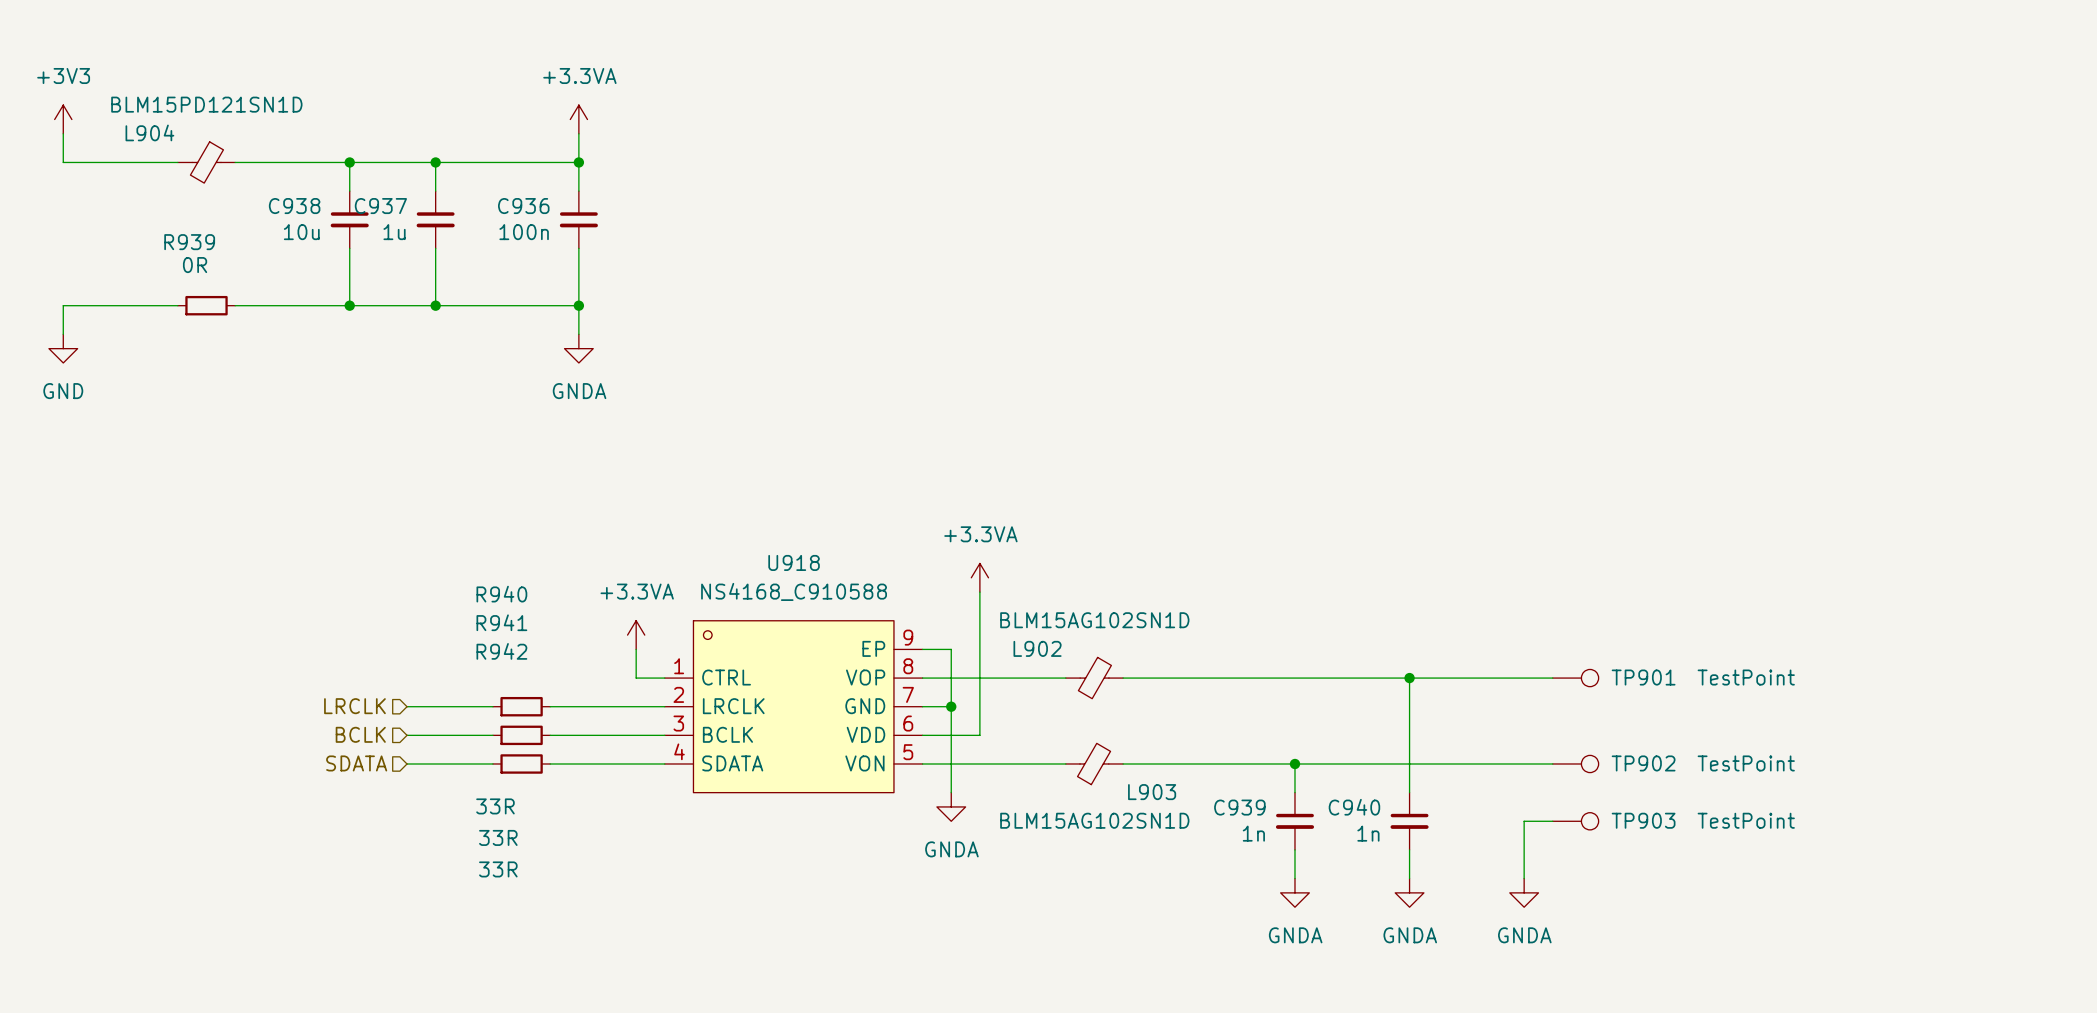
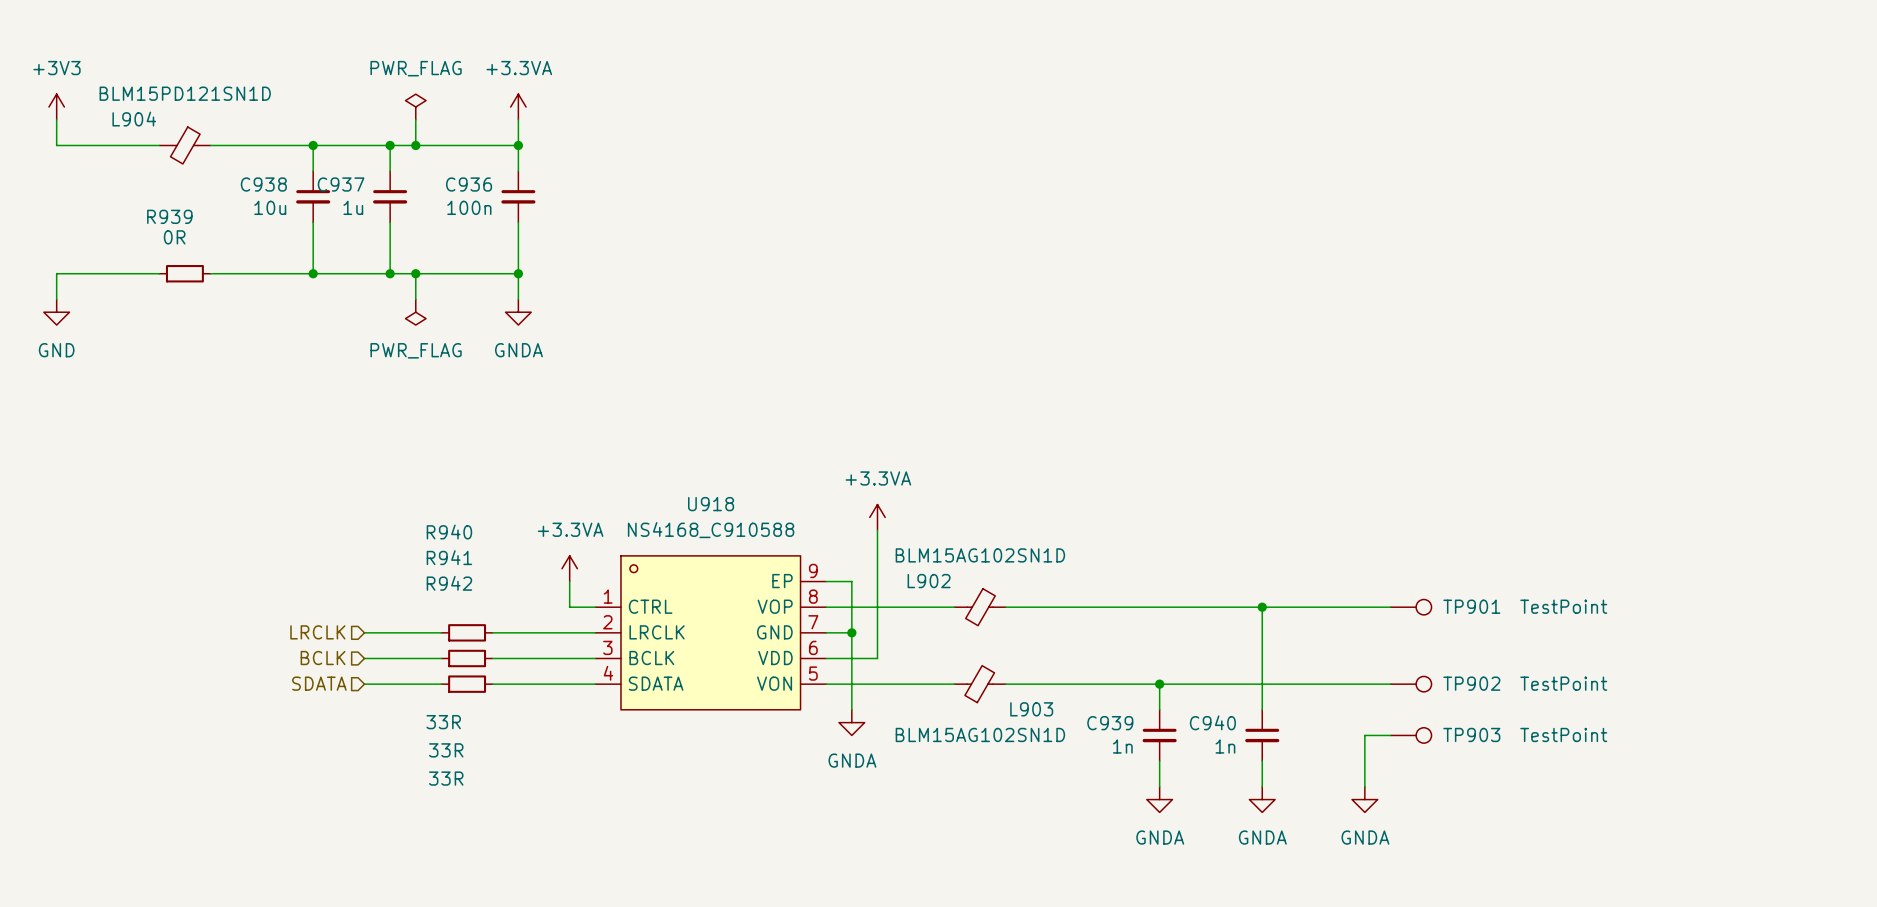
power symbol: none -> PWR_FLAG (415, 107)
wire: none -> (415, 119) (415, 145)
junction: none -> (415, 145)
wire: none -> (415, 273) (415, 299)
junction: none -> (415, 273)
power symbol: none -> PWR_FLAG (415, 312)

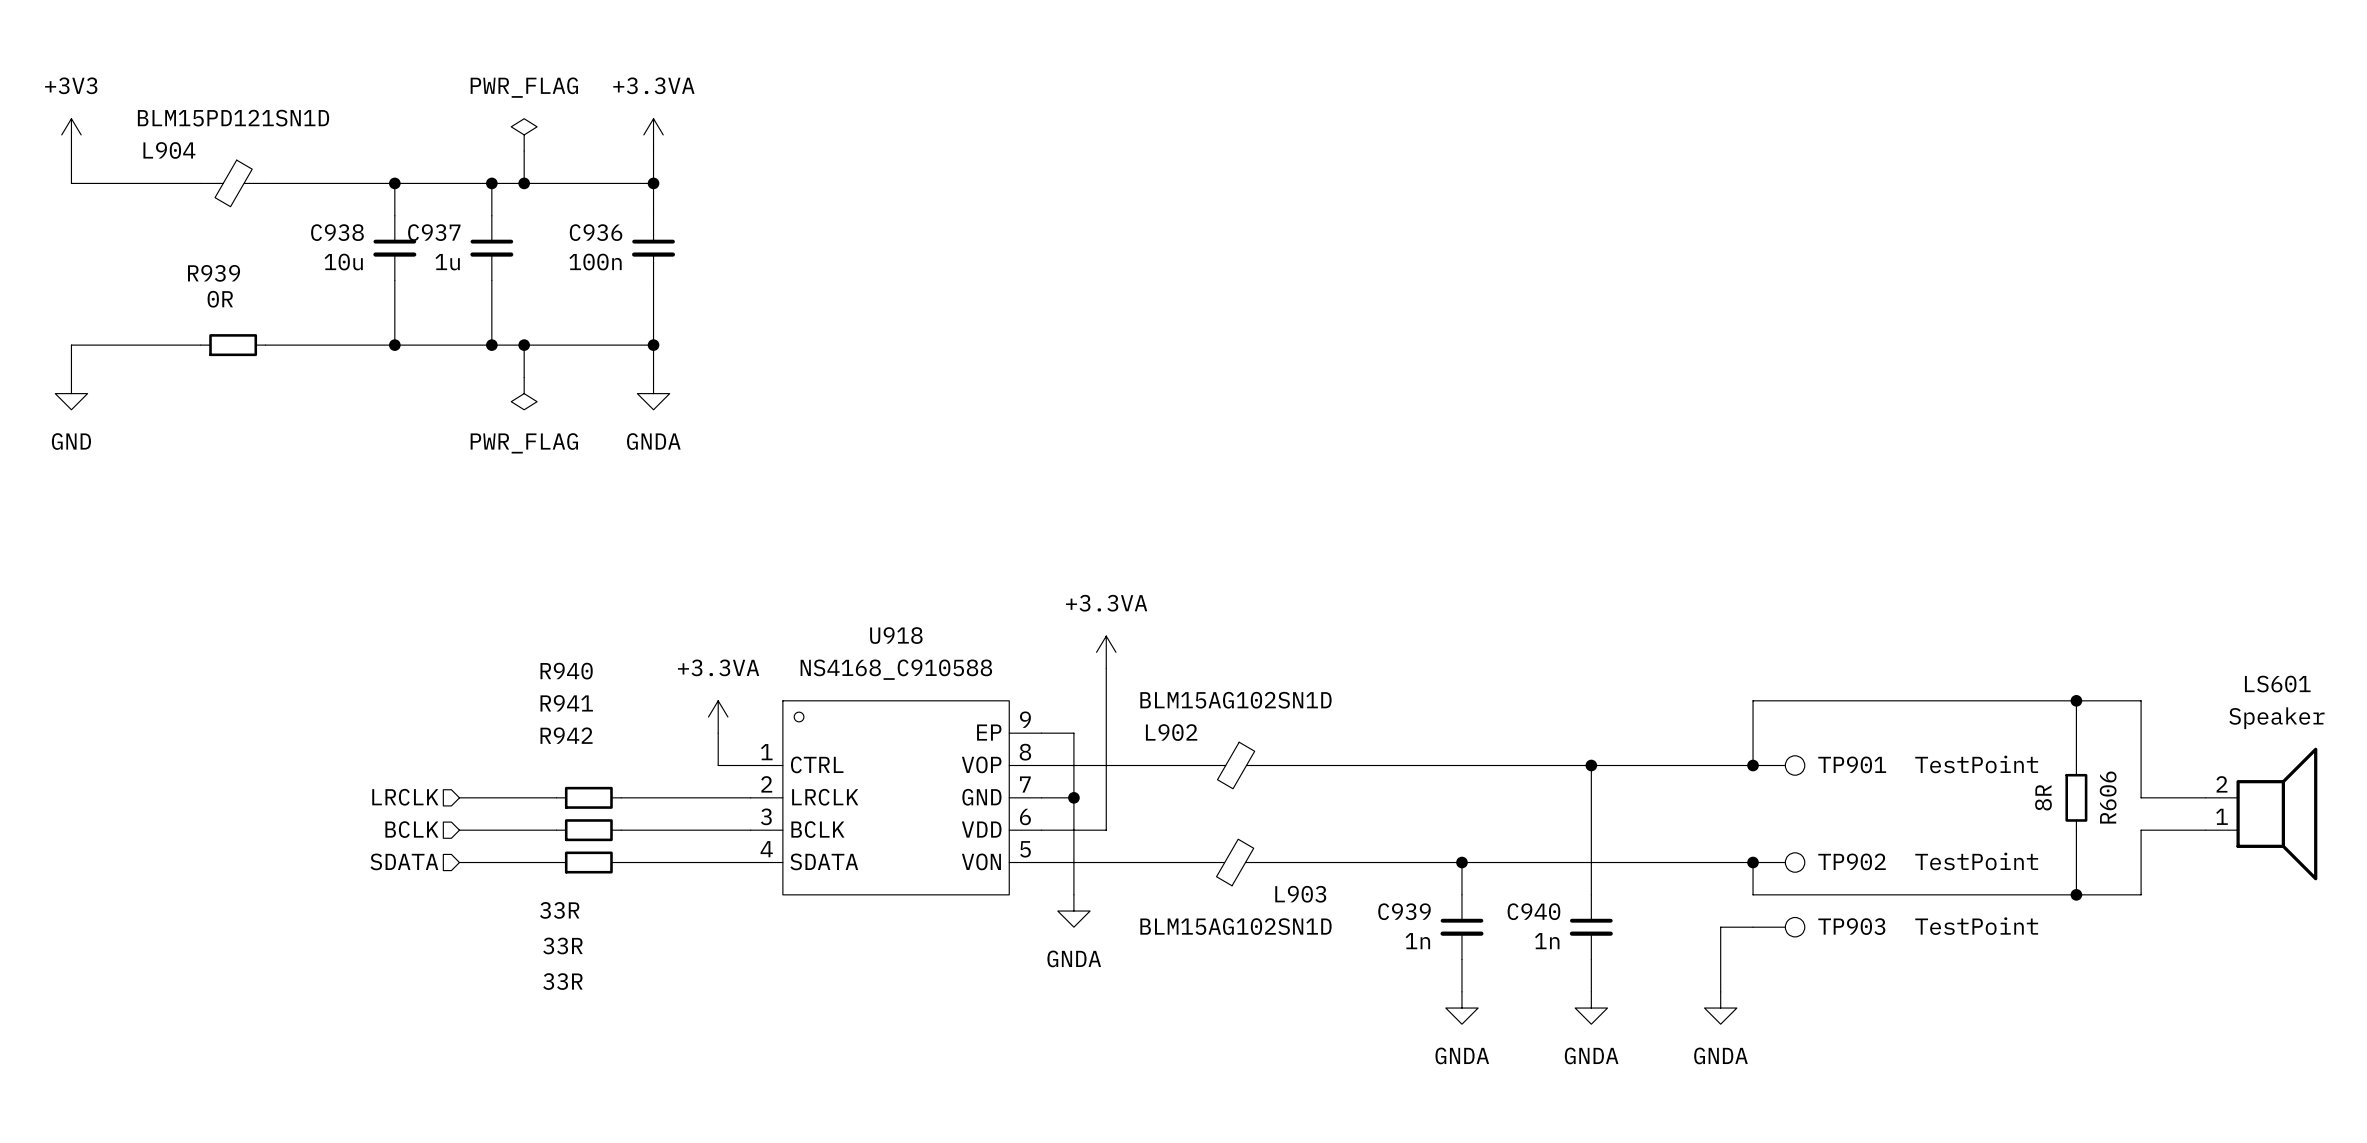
wire: none -> (2076, 700) (2076, 765)
junction: none -> (2076, 700)
wire: none -> (1753, 765) (1753, 700) (2141, 700) (2141, 797) (2205, 797)
junction: none -> (1753, 765)
R606: none -> 8R (2076, 797)
LS601: none -> Speaker (2261, 814)
wire: none -> (2076, 830) (2076, 894)
wire: none -> (2205, 830) (2141, 830) (2141, 894) (1753, 894) (1753, 862)
junction: none -> (1753, 862)
junction: none -> (2076, 894)

